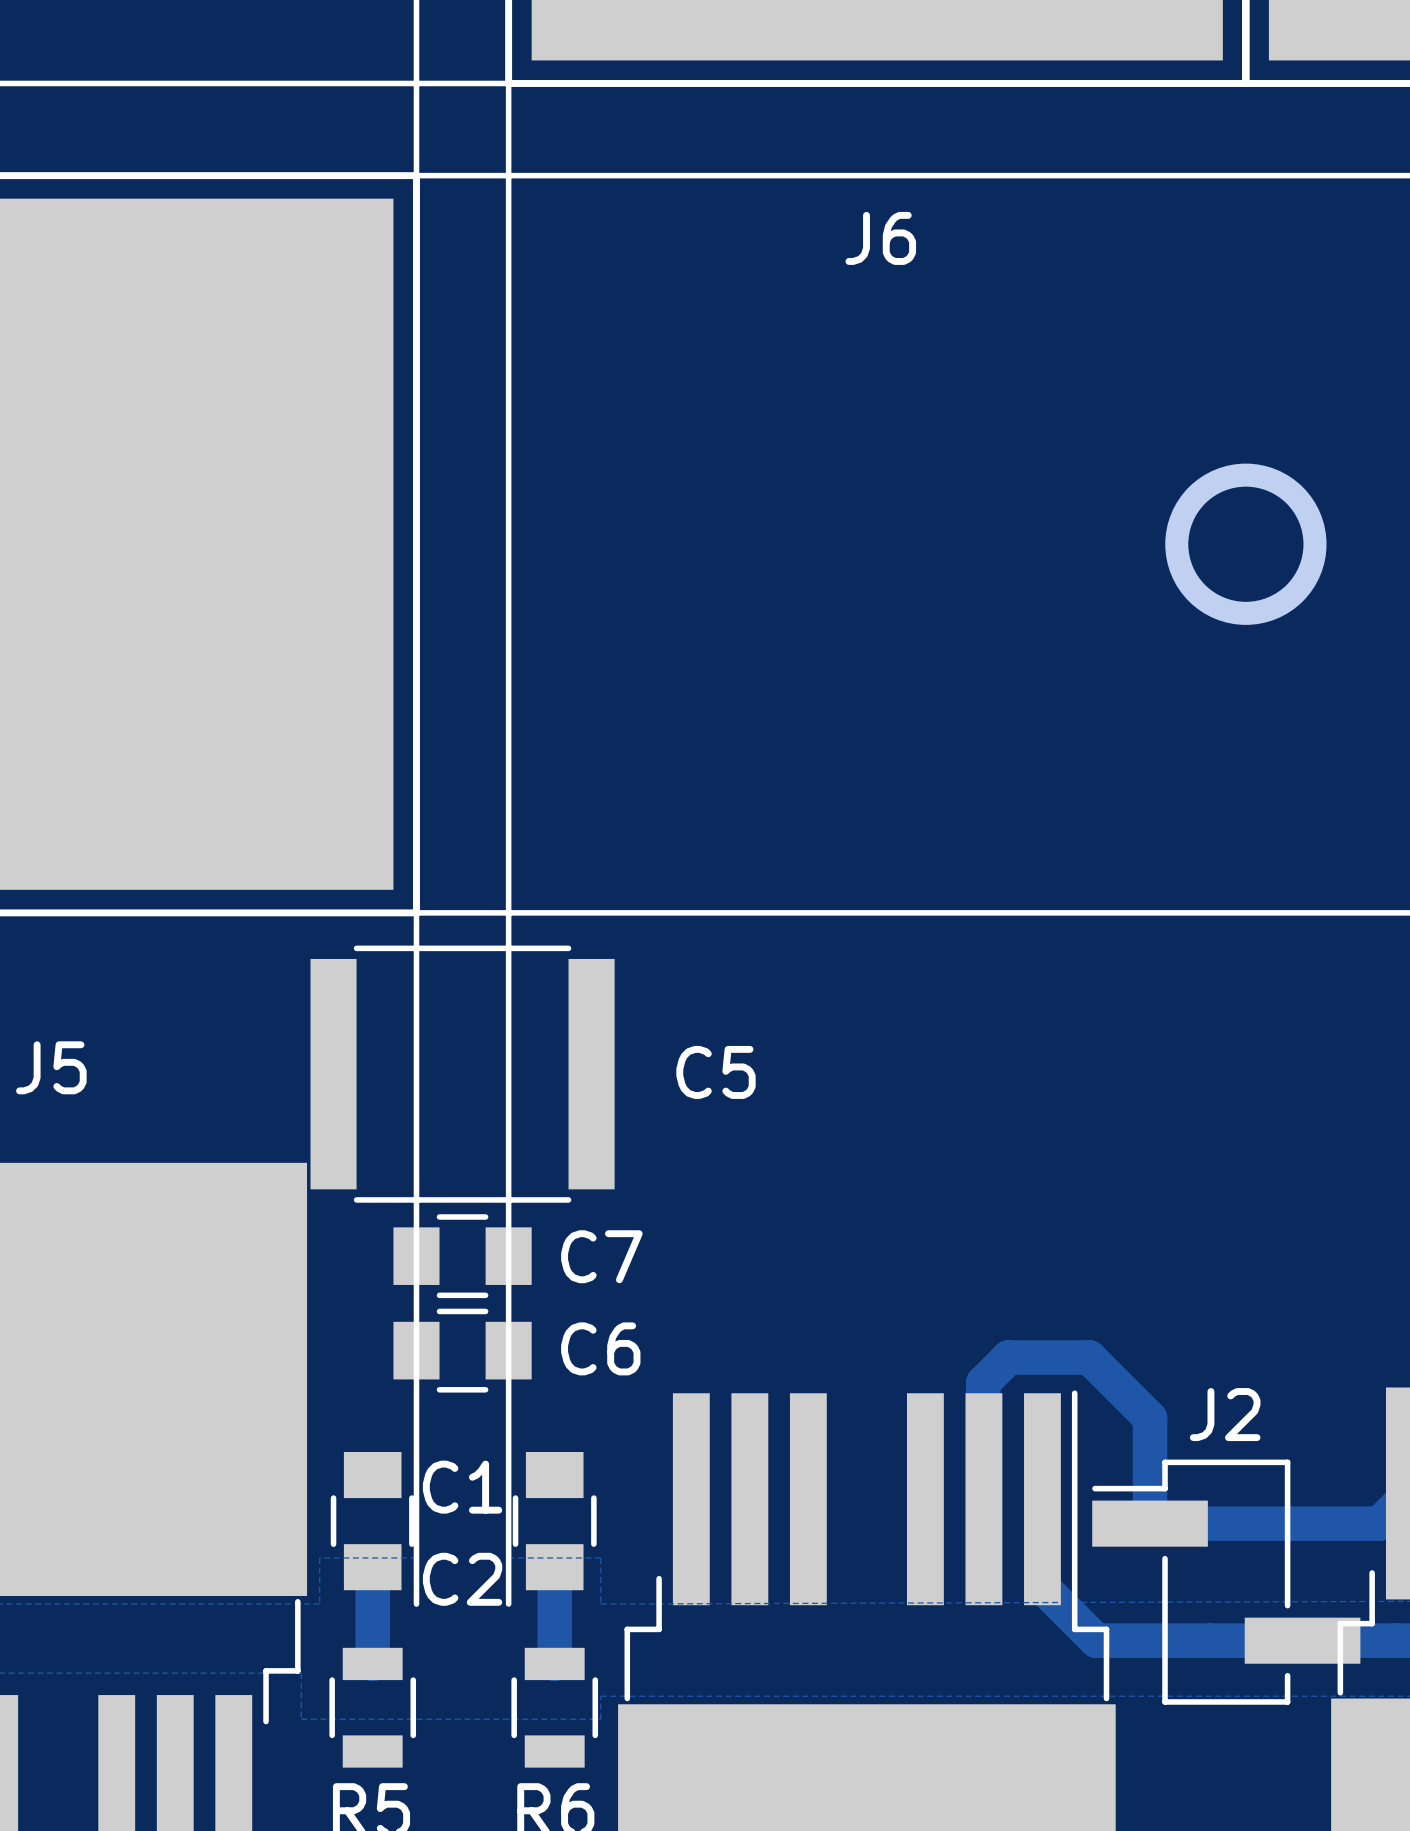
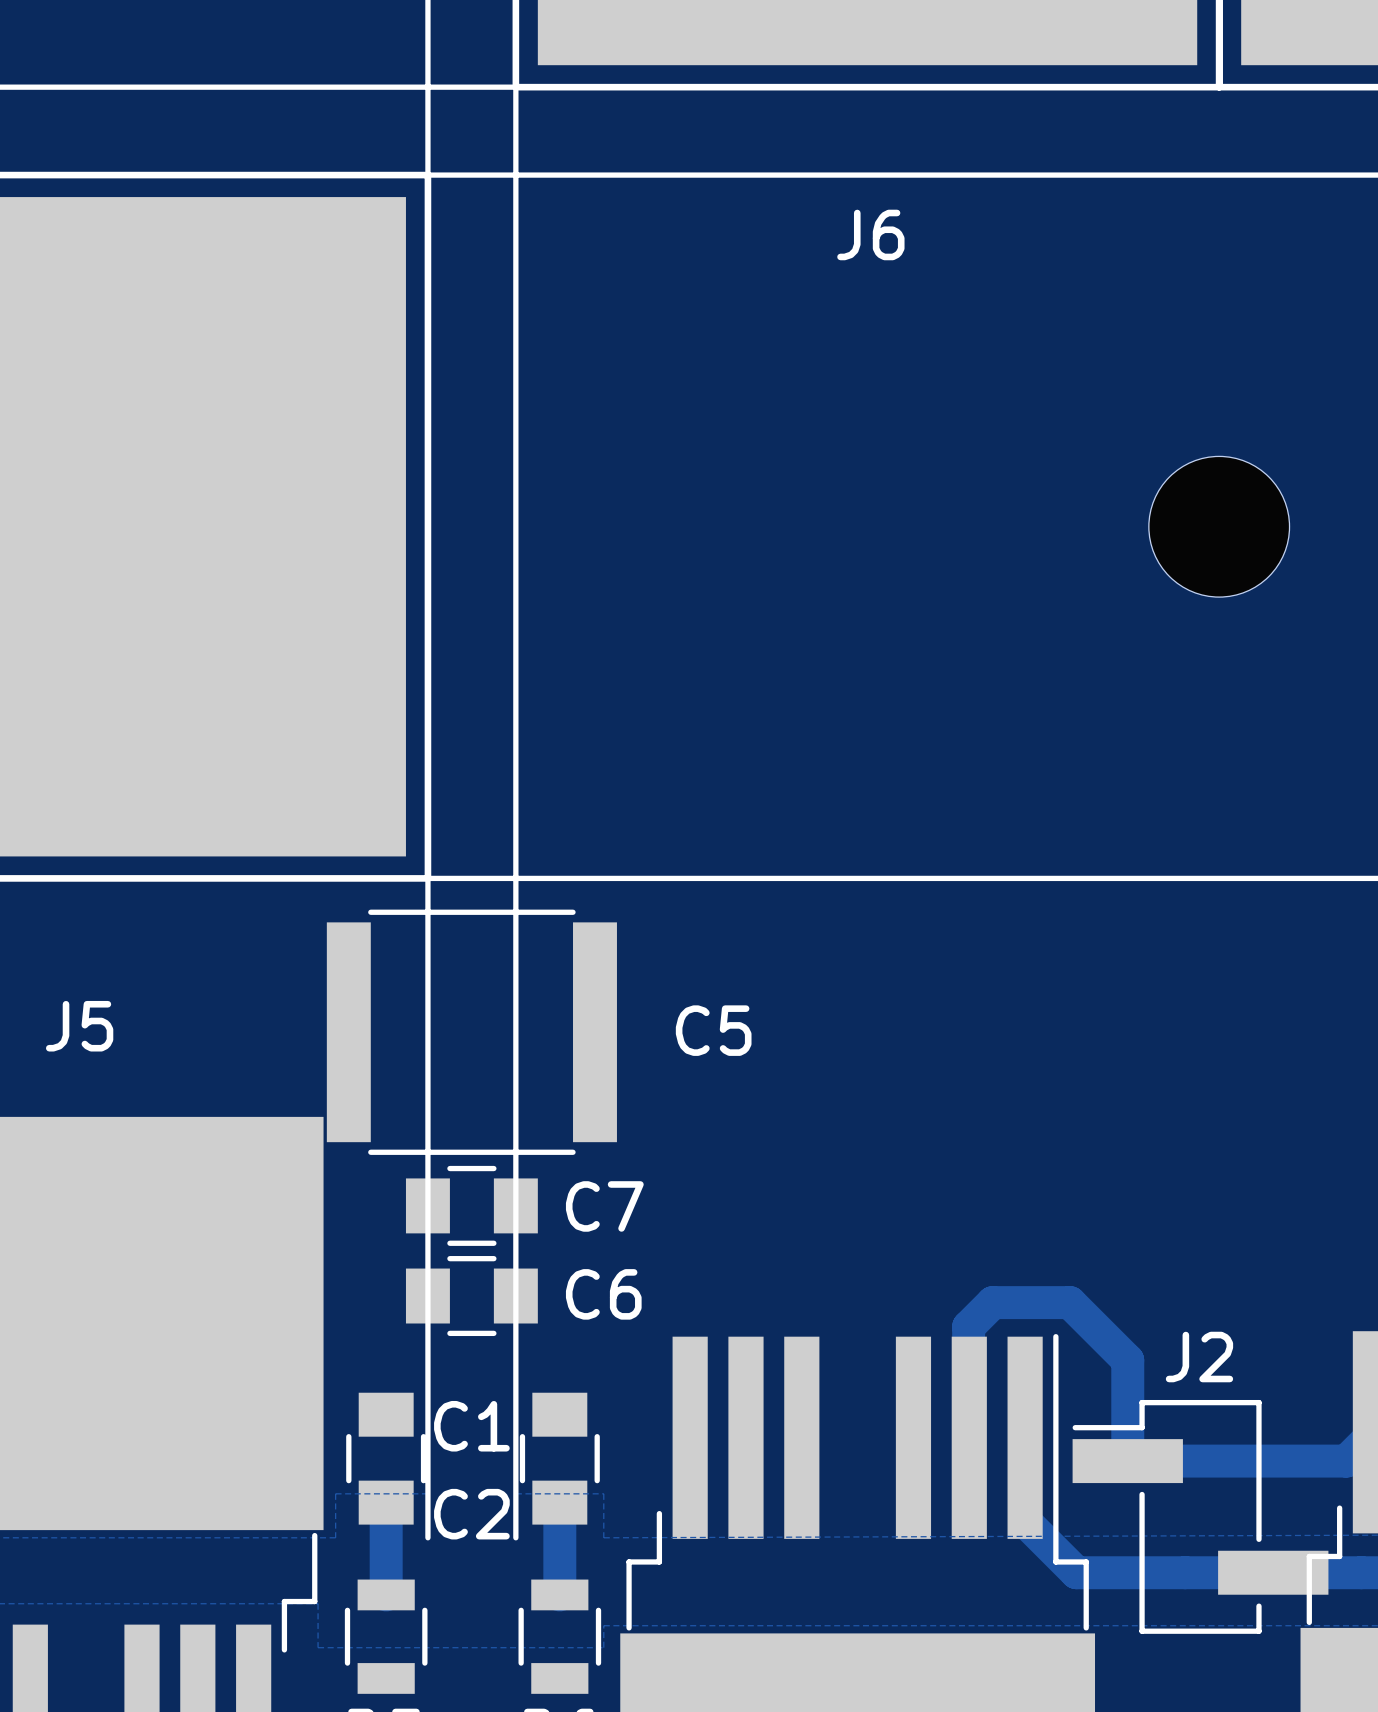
round board edge: [1165, 463, 1327, 625] -> none
part: none -> (1219, 526)

